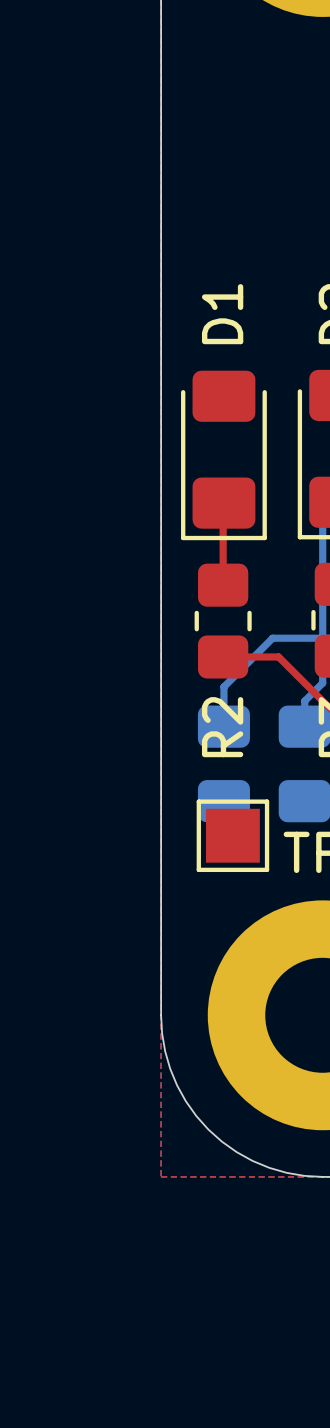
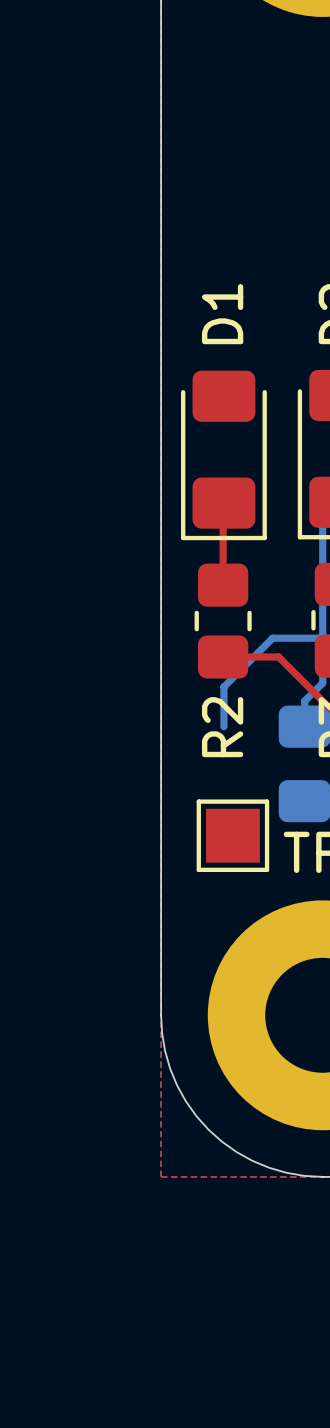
part: (223, 763) -> none

